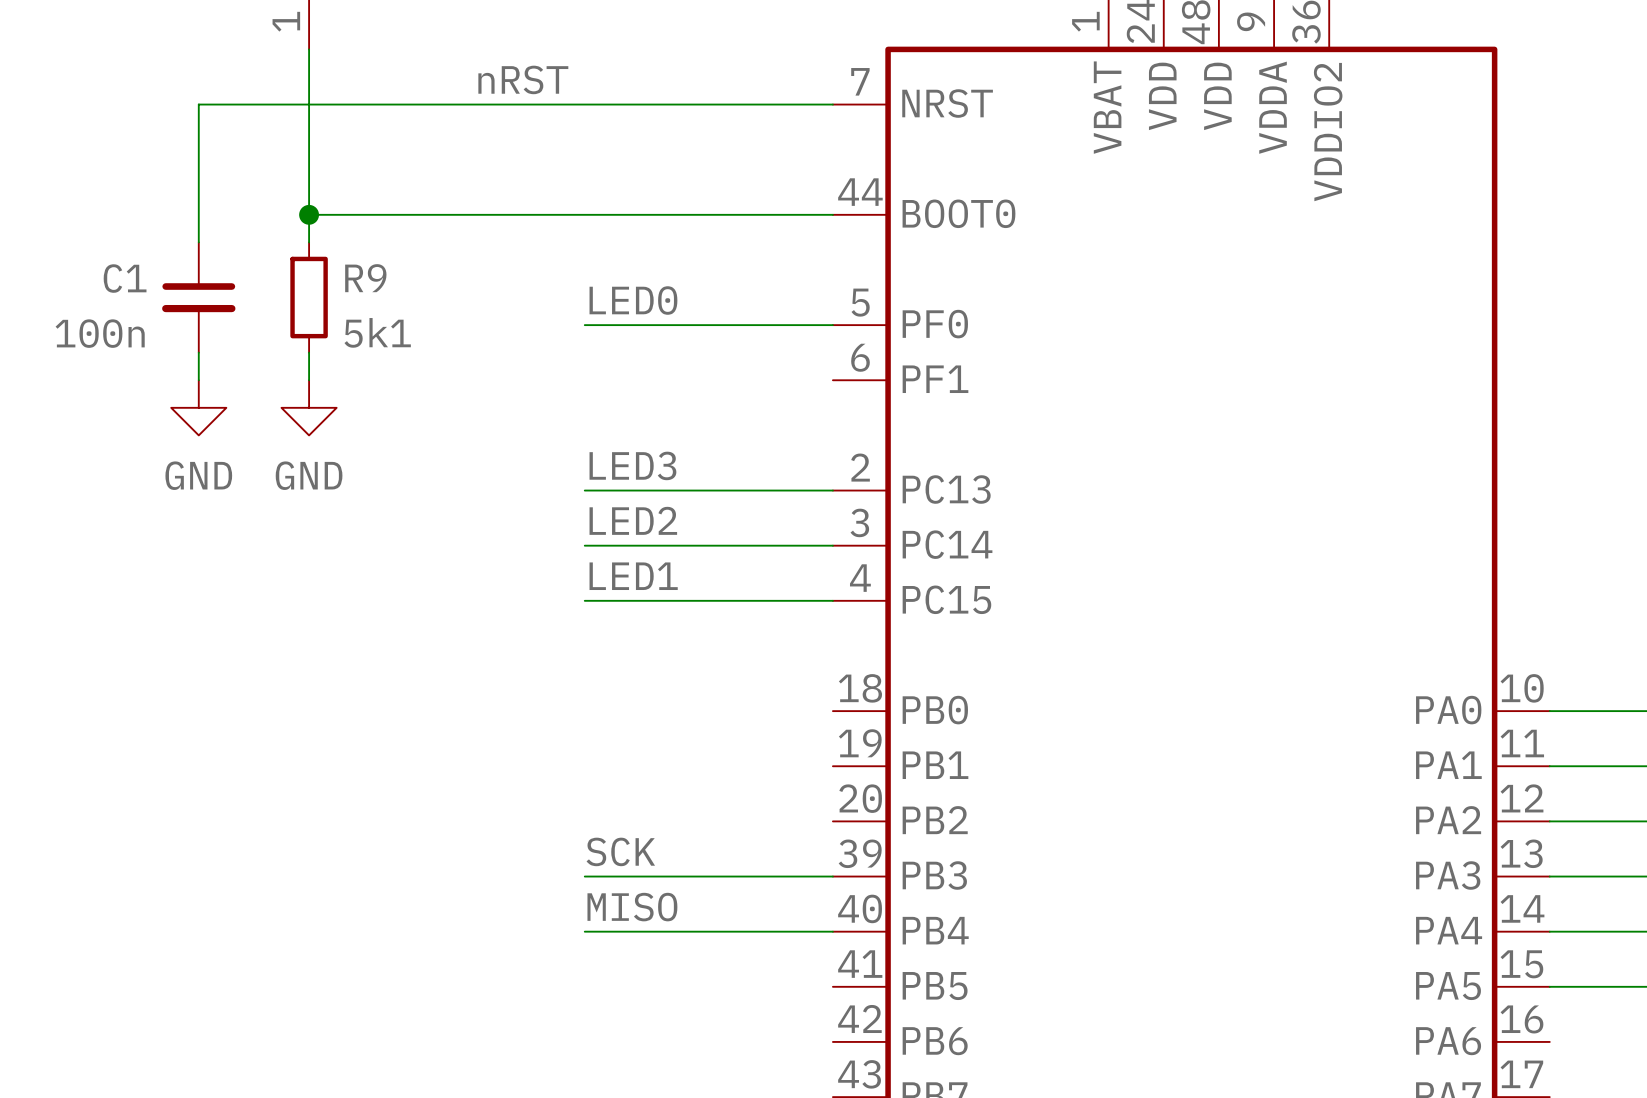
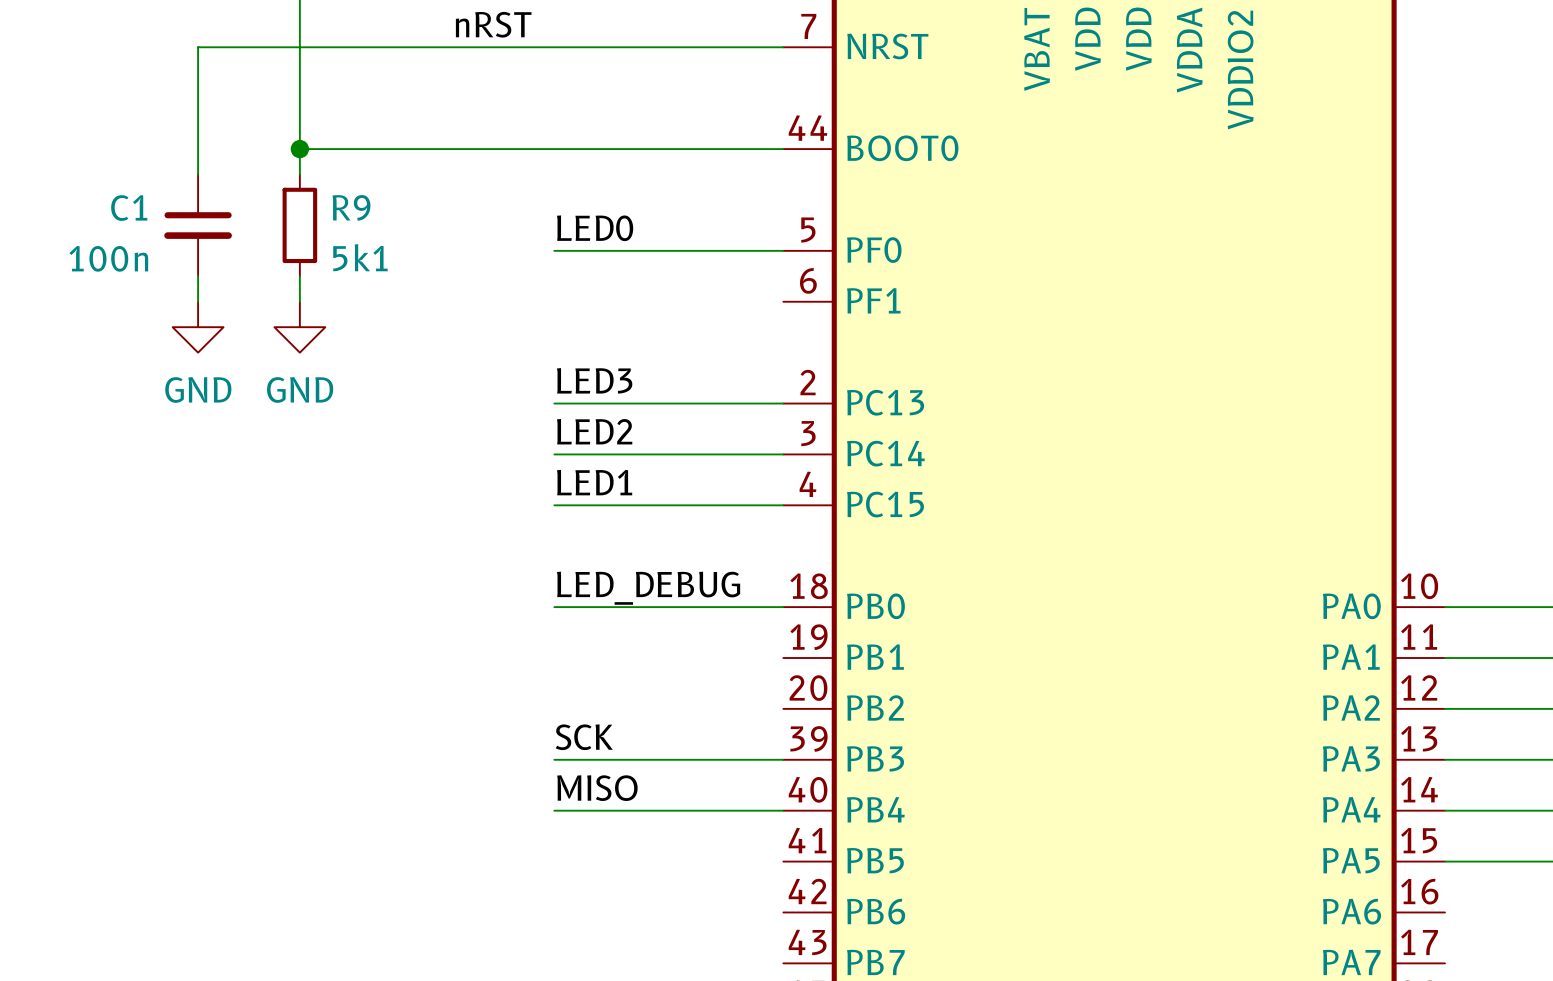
label: none -> LED_DEBUG (648, 588)
wire: none -> (554, 607) (783, 607)

